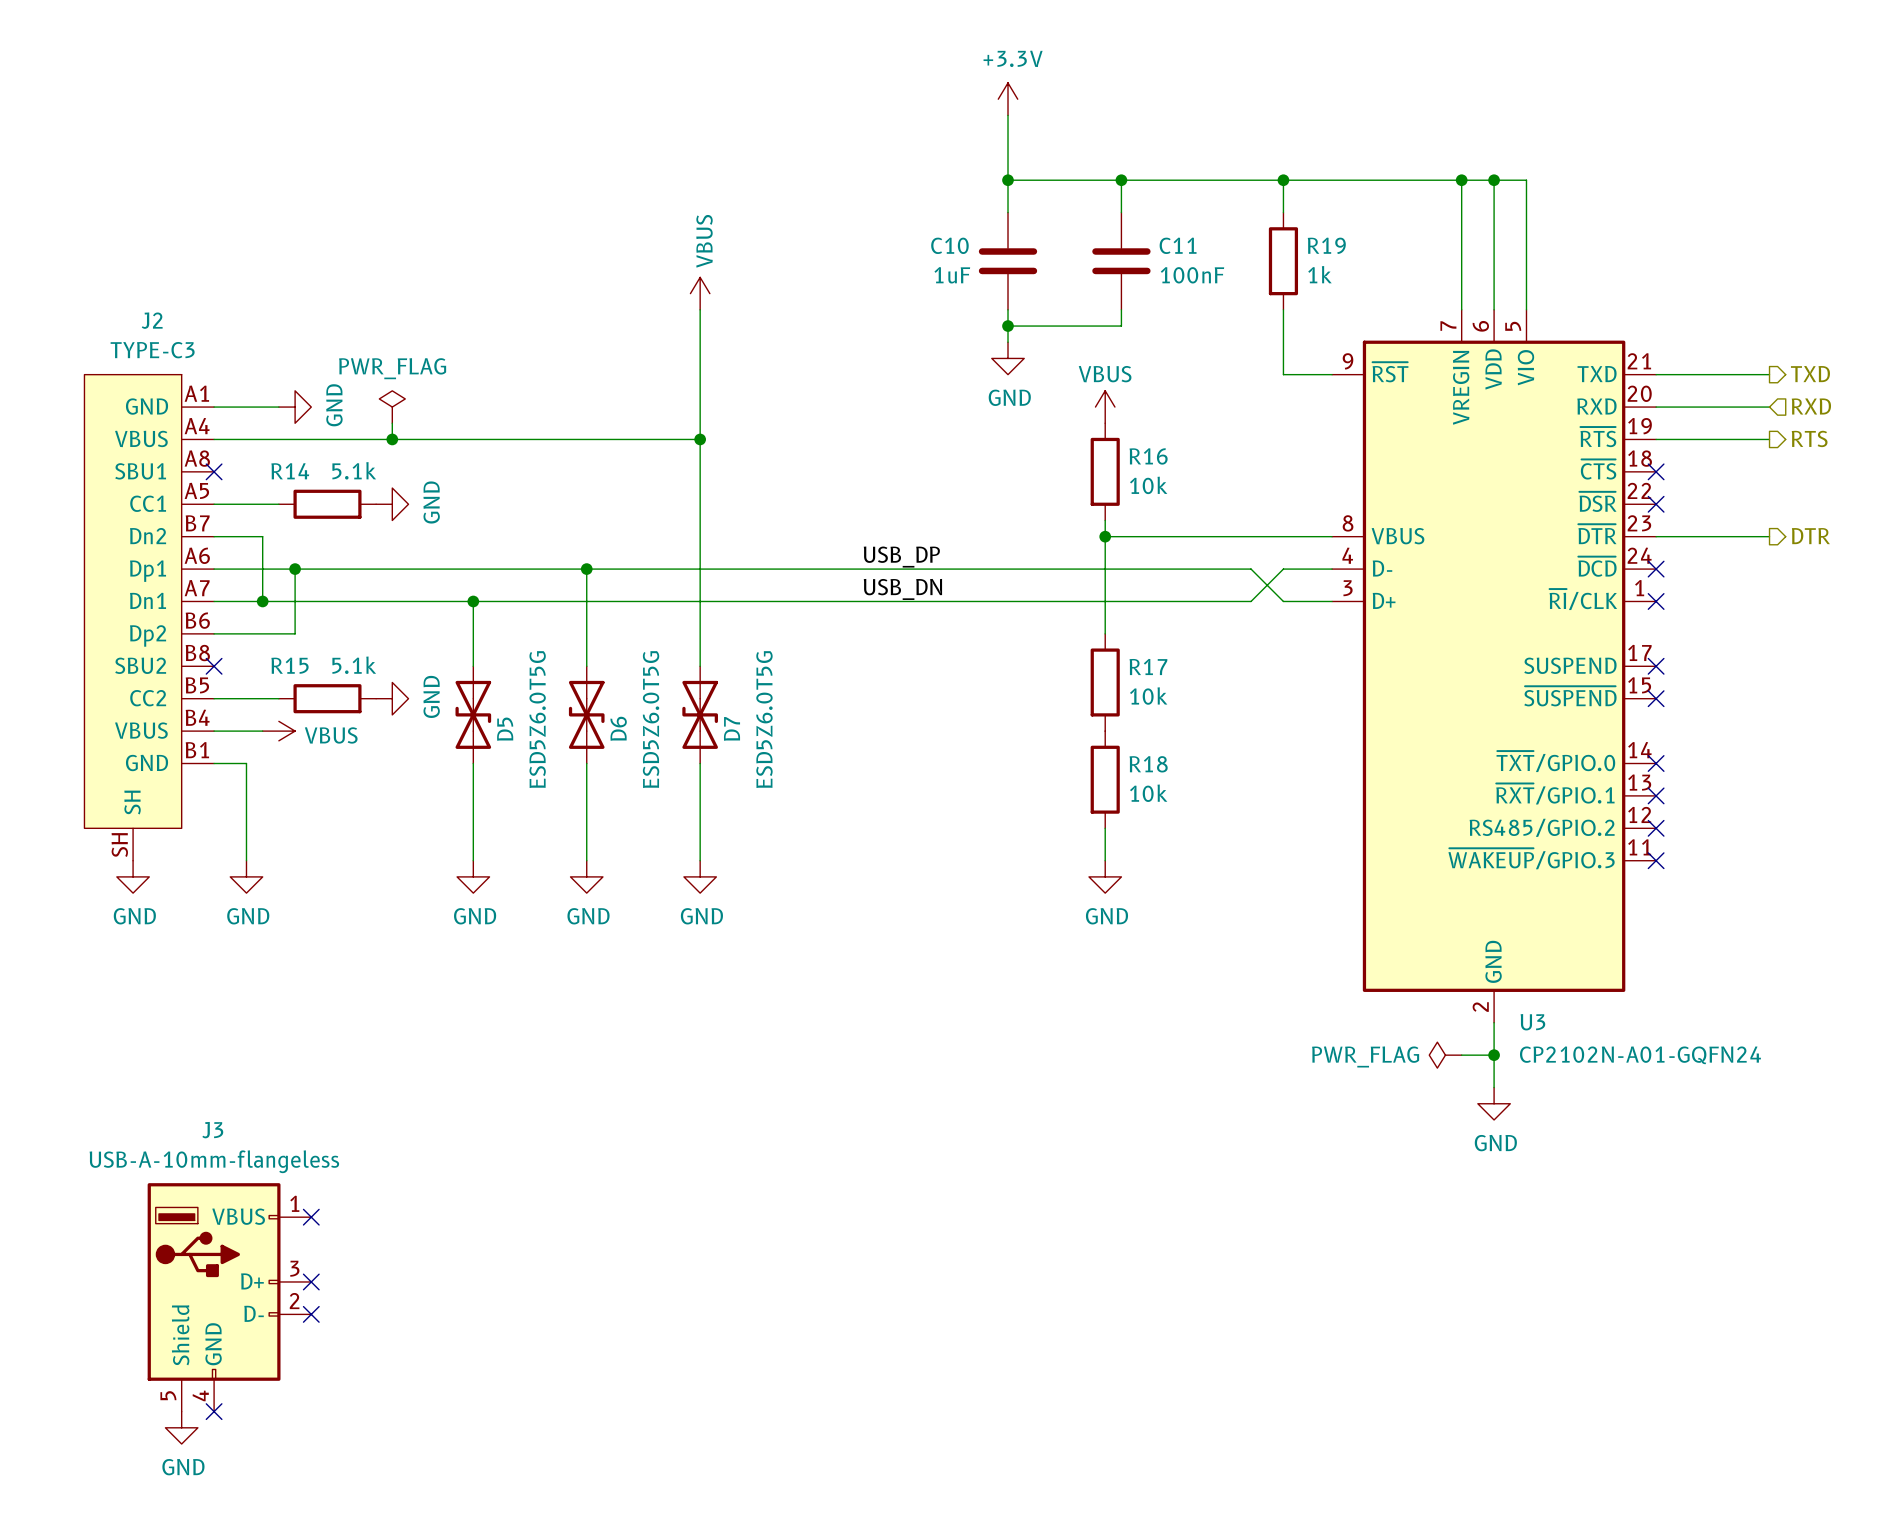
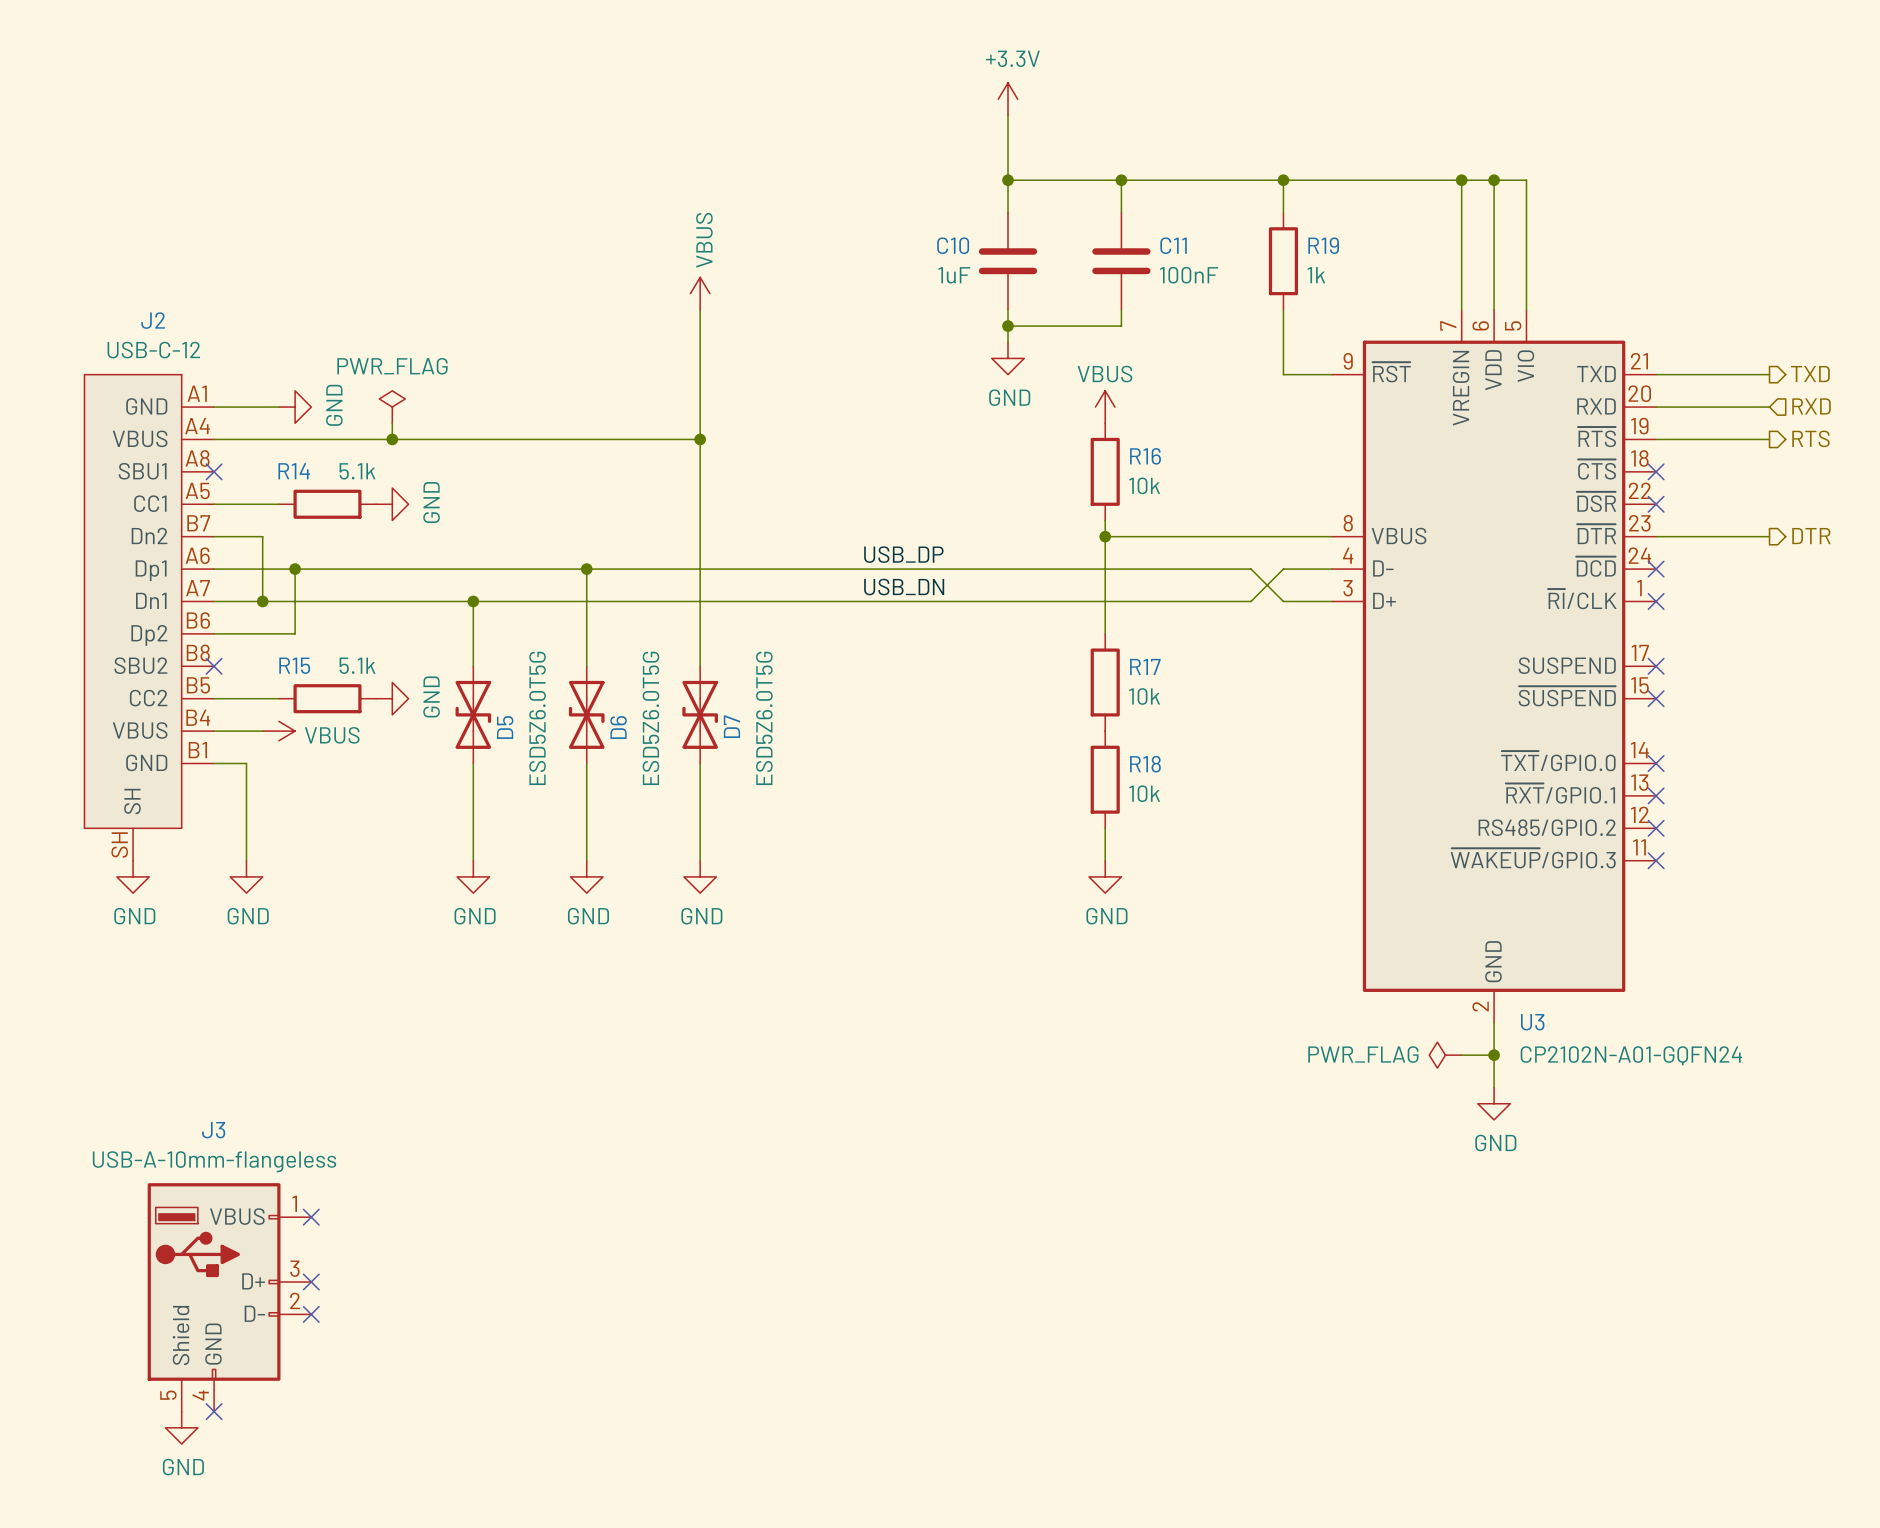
J2 value: TYPE-C3 (152, 350) -> USB-C-12 (153, 350)

